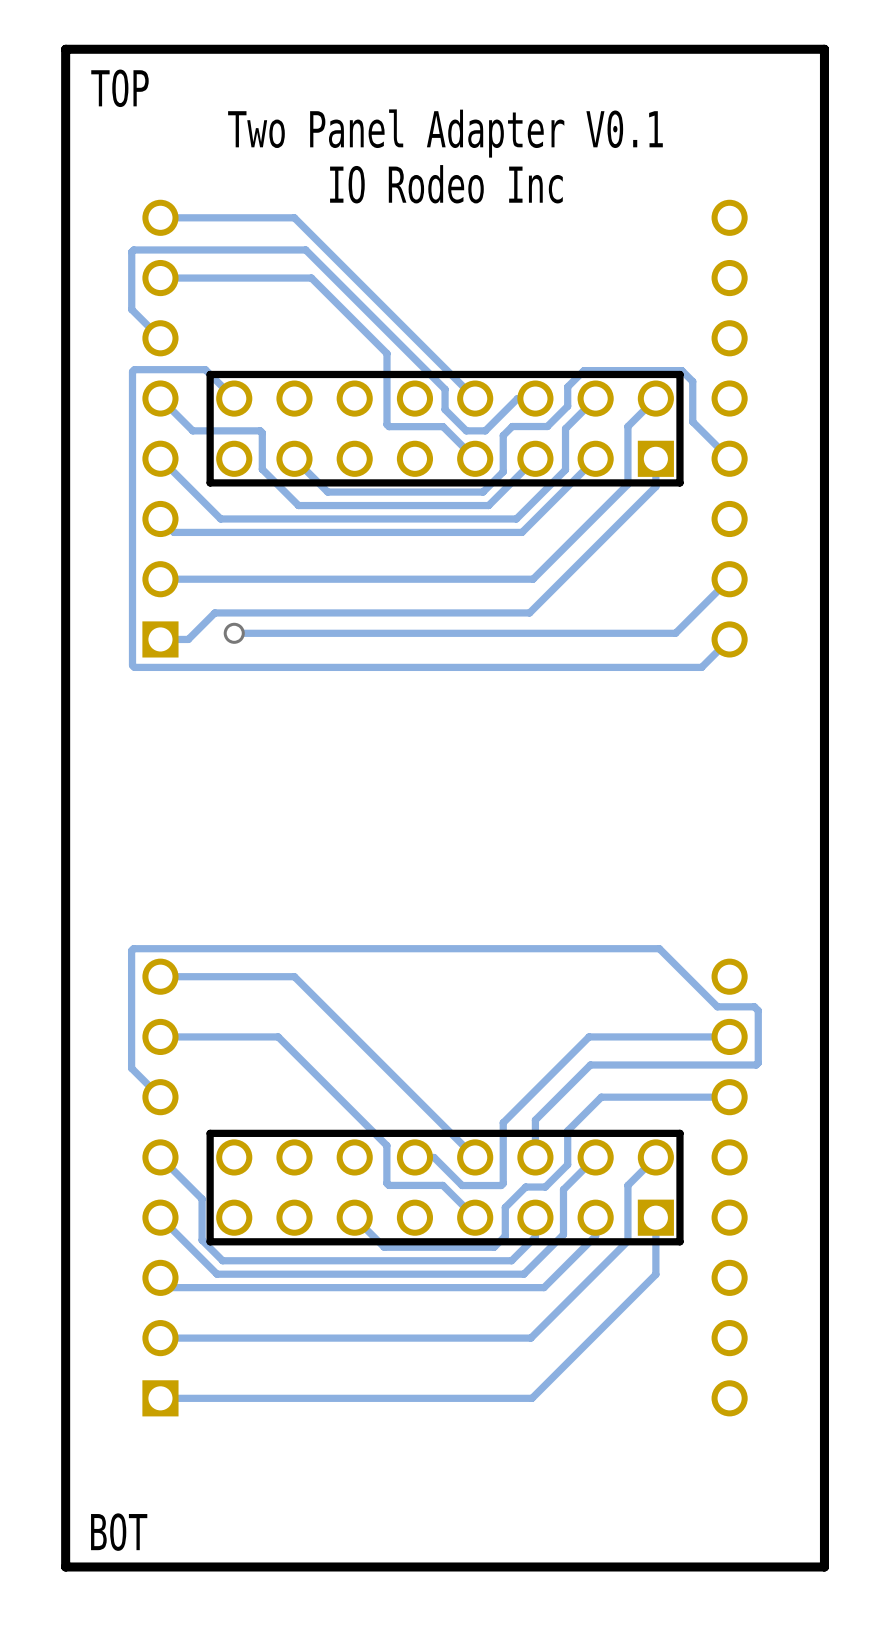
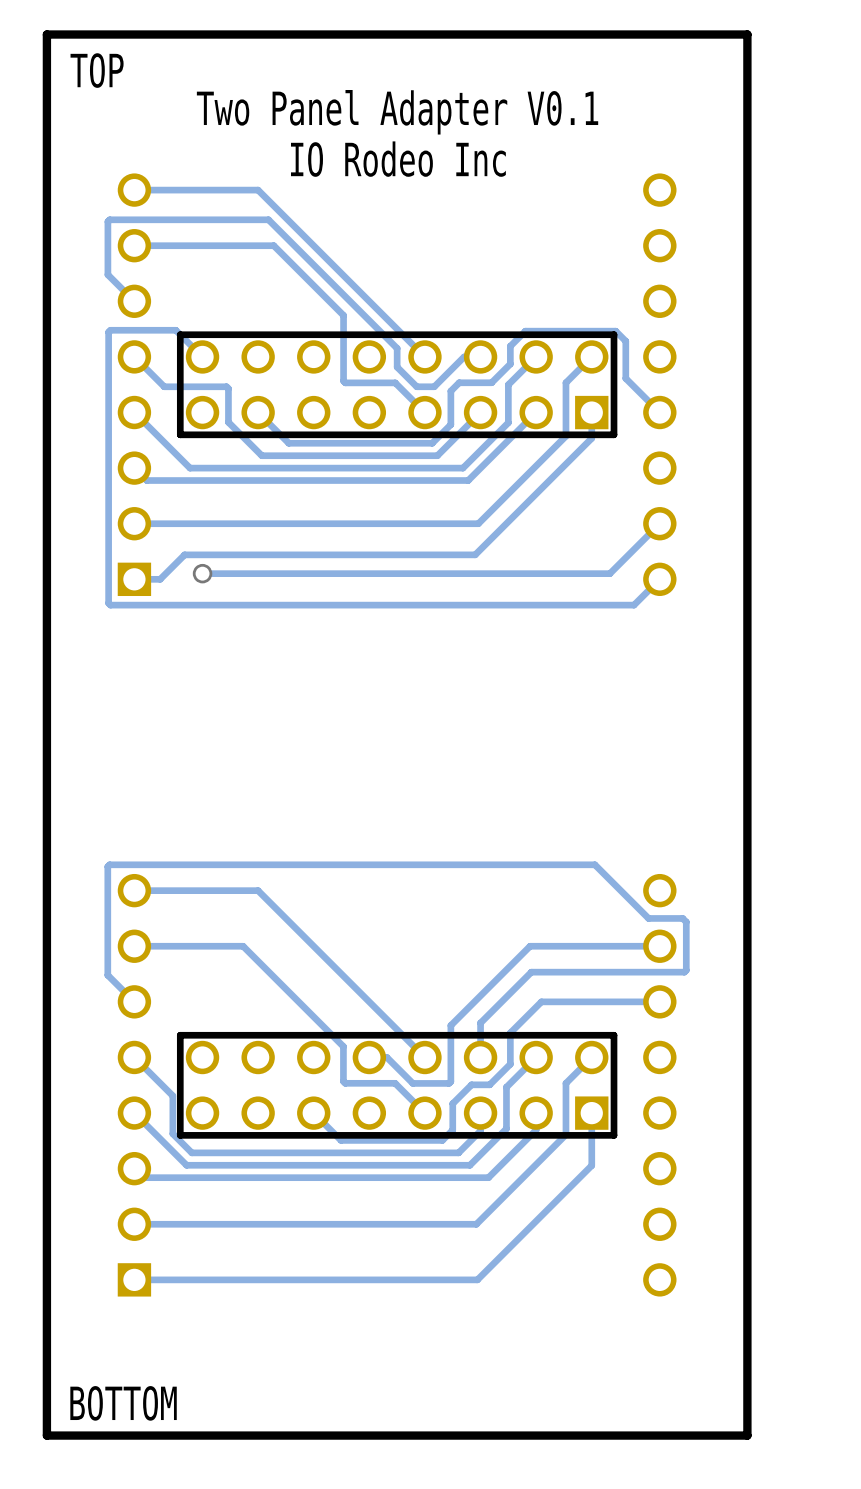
text: BOT (119, 1532) -> BOTTOM (123, 1403)

